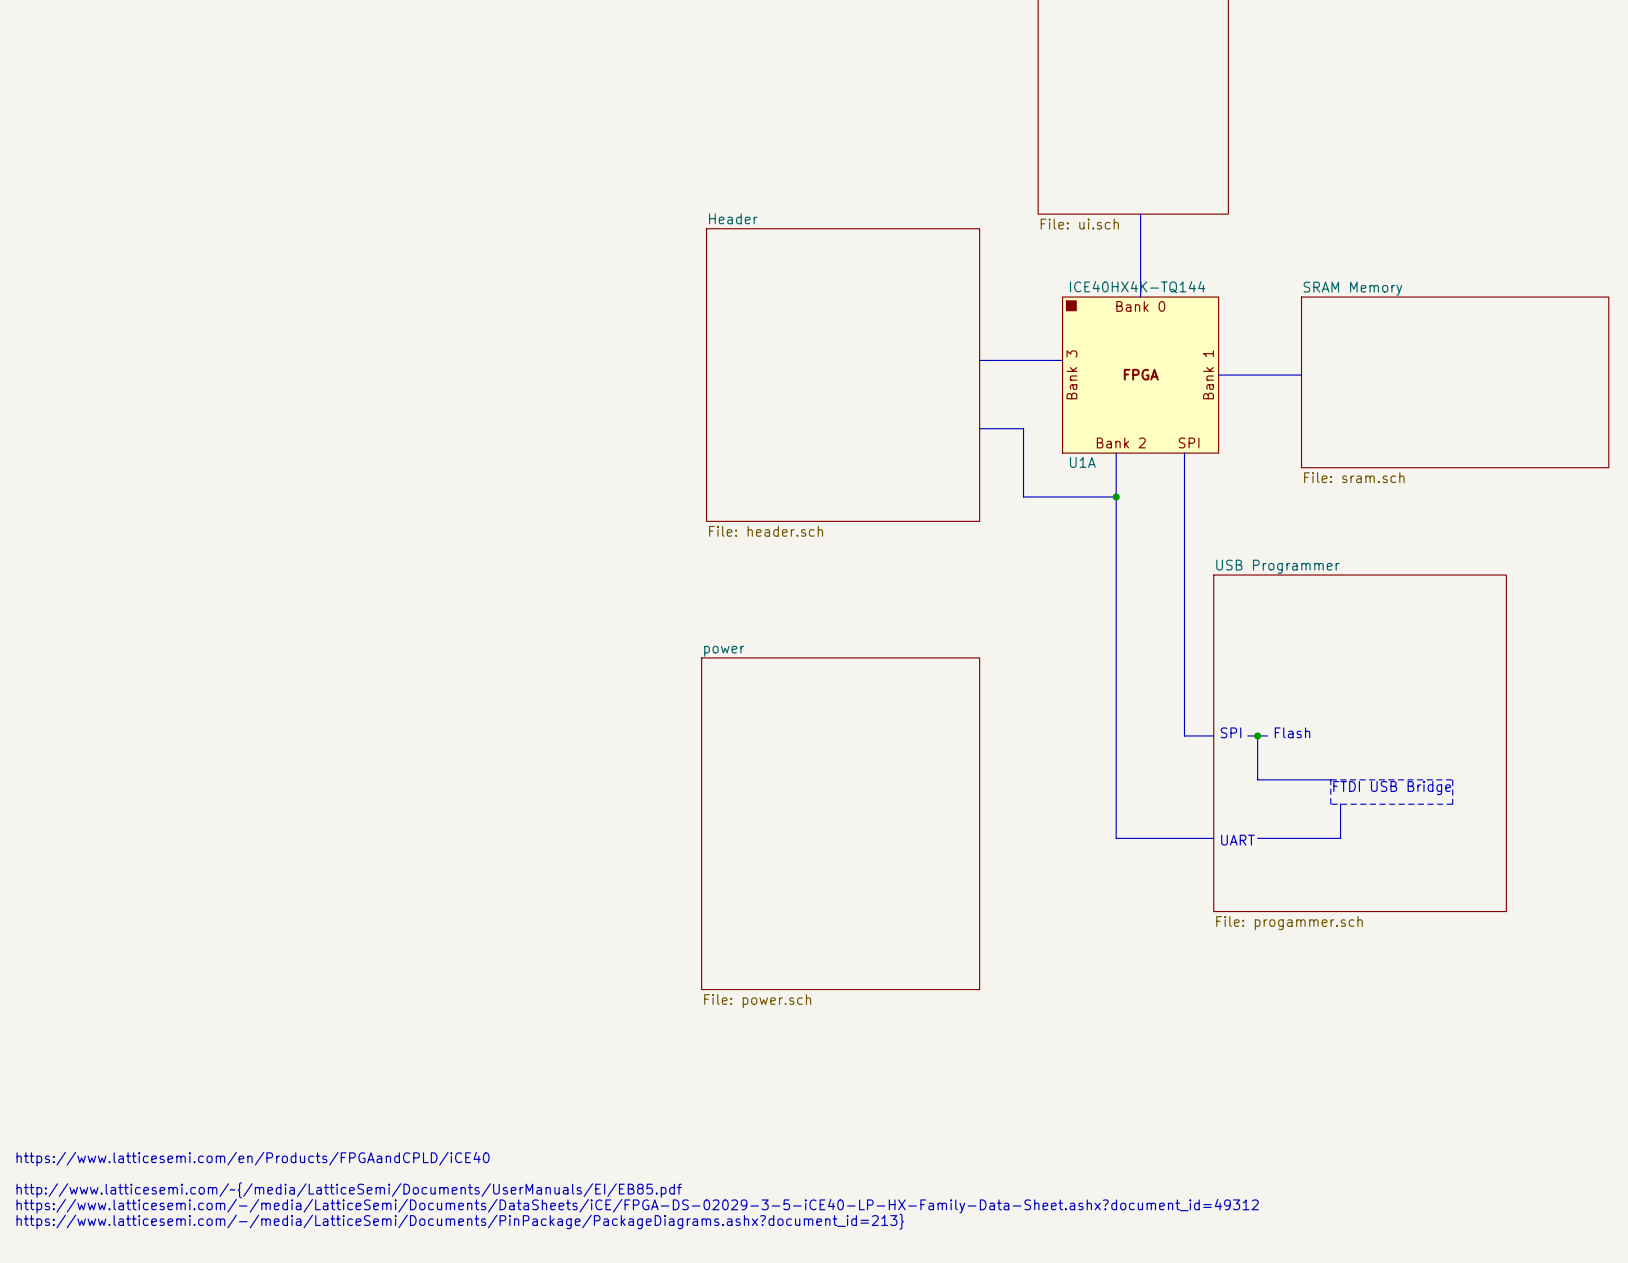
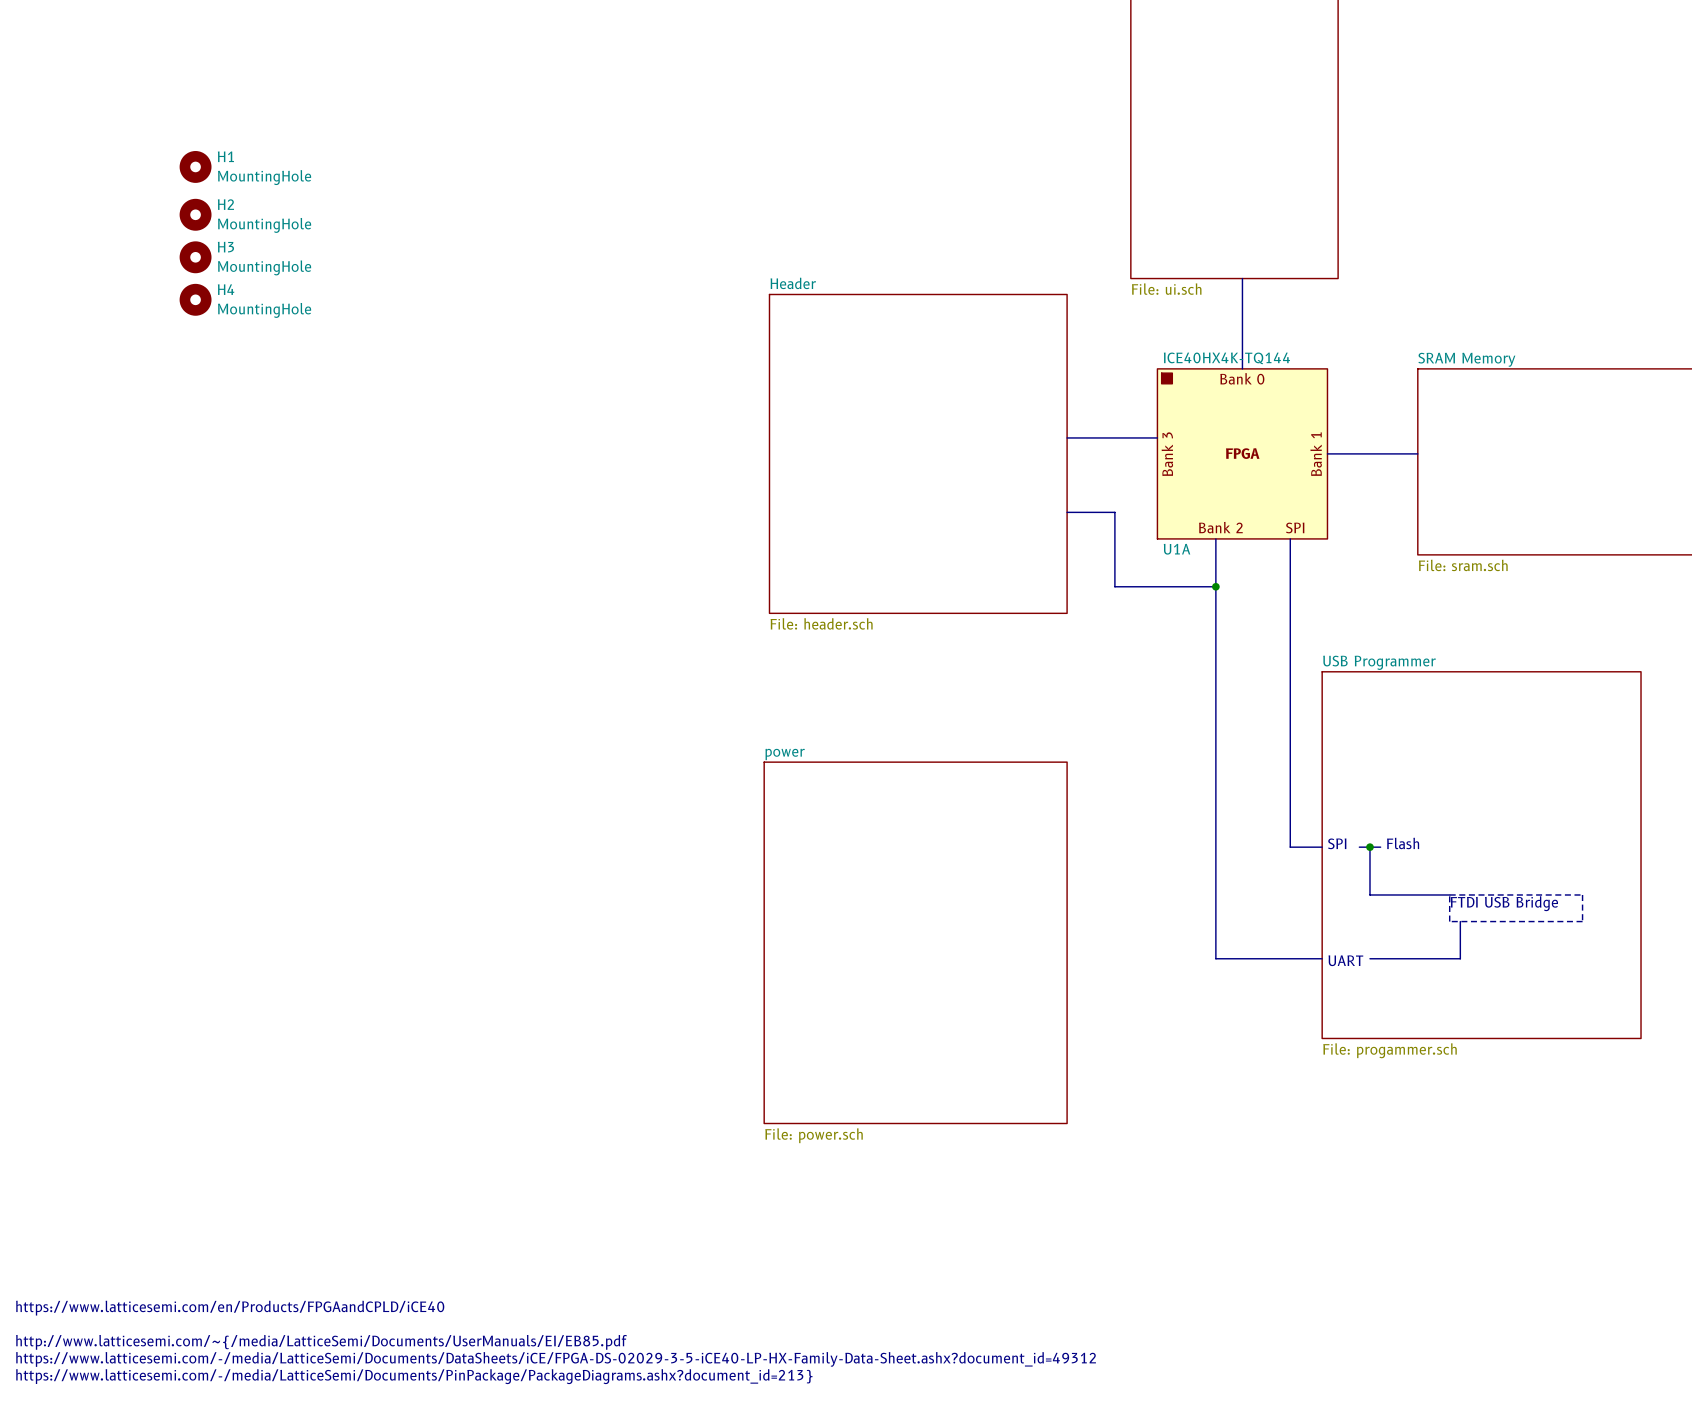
H1: none -> MountingHole (195, 166)
H2: none -> MountingHole (195, 214)
H3: none -> MountingHole (195, 257)
H4: none -> MountingHole (195, 299)

